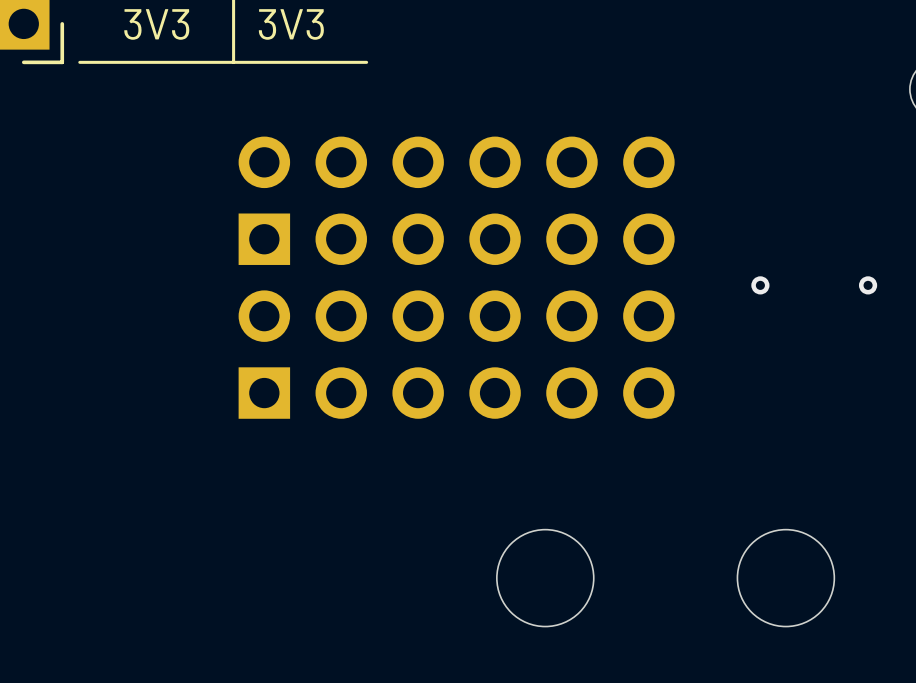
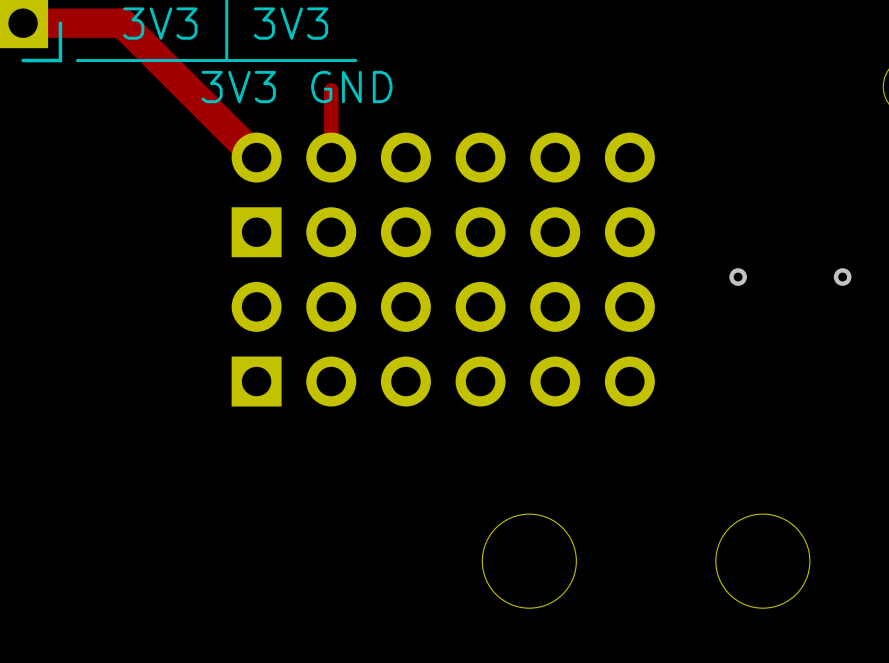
track: none -> (23, 23) (122, 23) (256, 157)
text: none -> 3V3 (238, 87)
text: none -> GND (351, 87)
track: none -> (331, 90) (331, 157)

